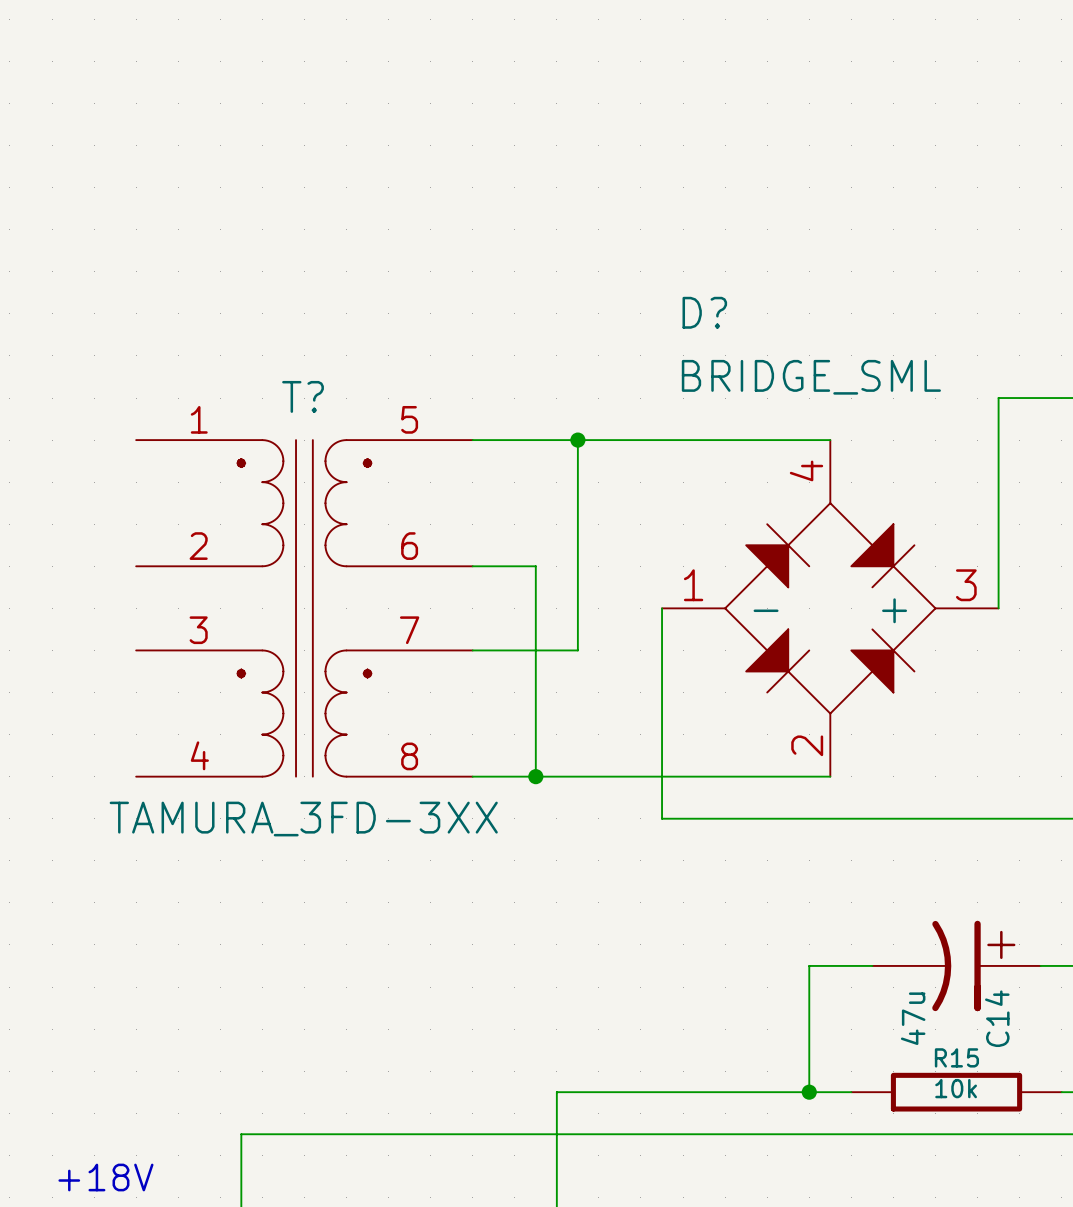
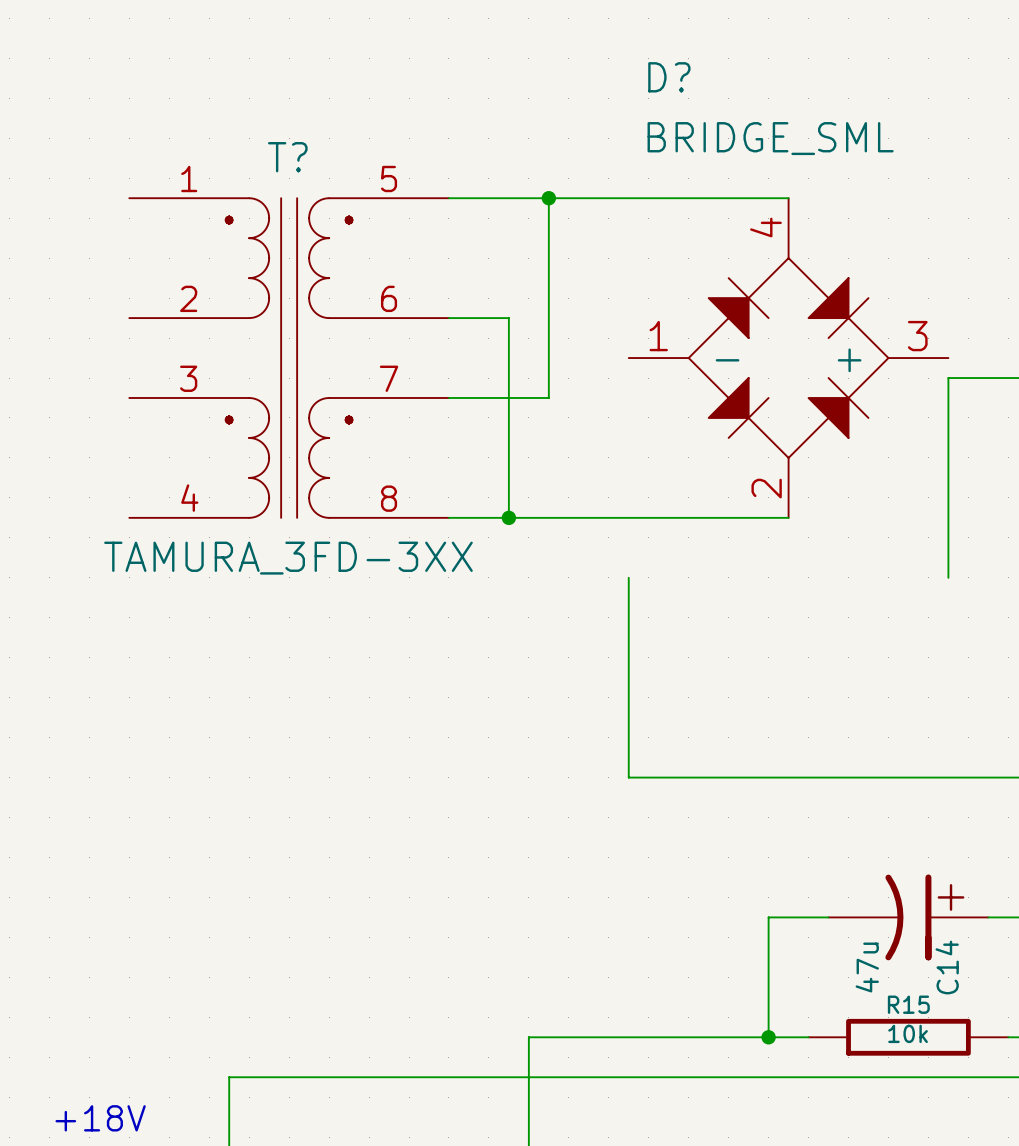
junction: none -> (548, 198)
wire: (472, 440) (830, 440) -> (448, 198) (788, 198)
wire: (577, 440) (577, 650) (472, 650) -> (548, 198) (548, 397) (448, 397)
junction: (577, 440) -> none
junction: none -> (508, 517)
wire: (472, 566) (535, 566) (535, 776) -> (448, 318) (508, 318) (508, 517)
T? position: (304, 608) -> (289, 358)
D? position: (830, 608) -> (788, 358)
wire: (472, 776) (830, 776) -> (448, 517) (788, 517)
junction: (535, 776) -> none

